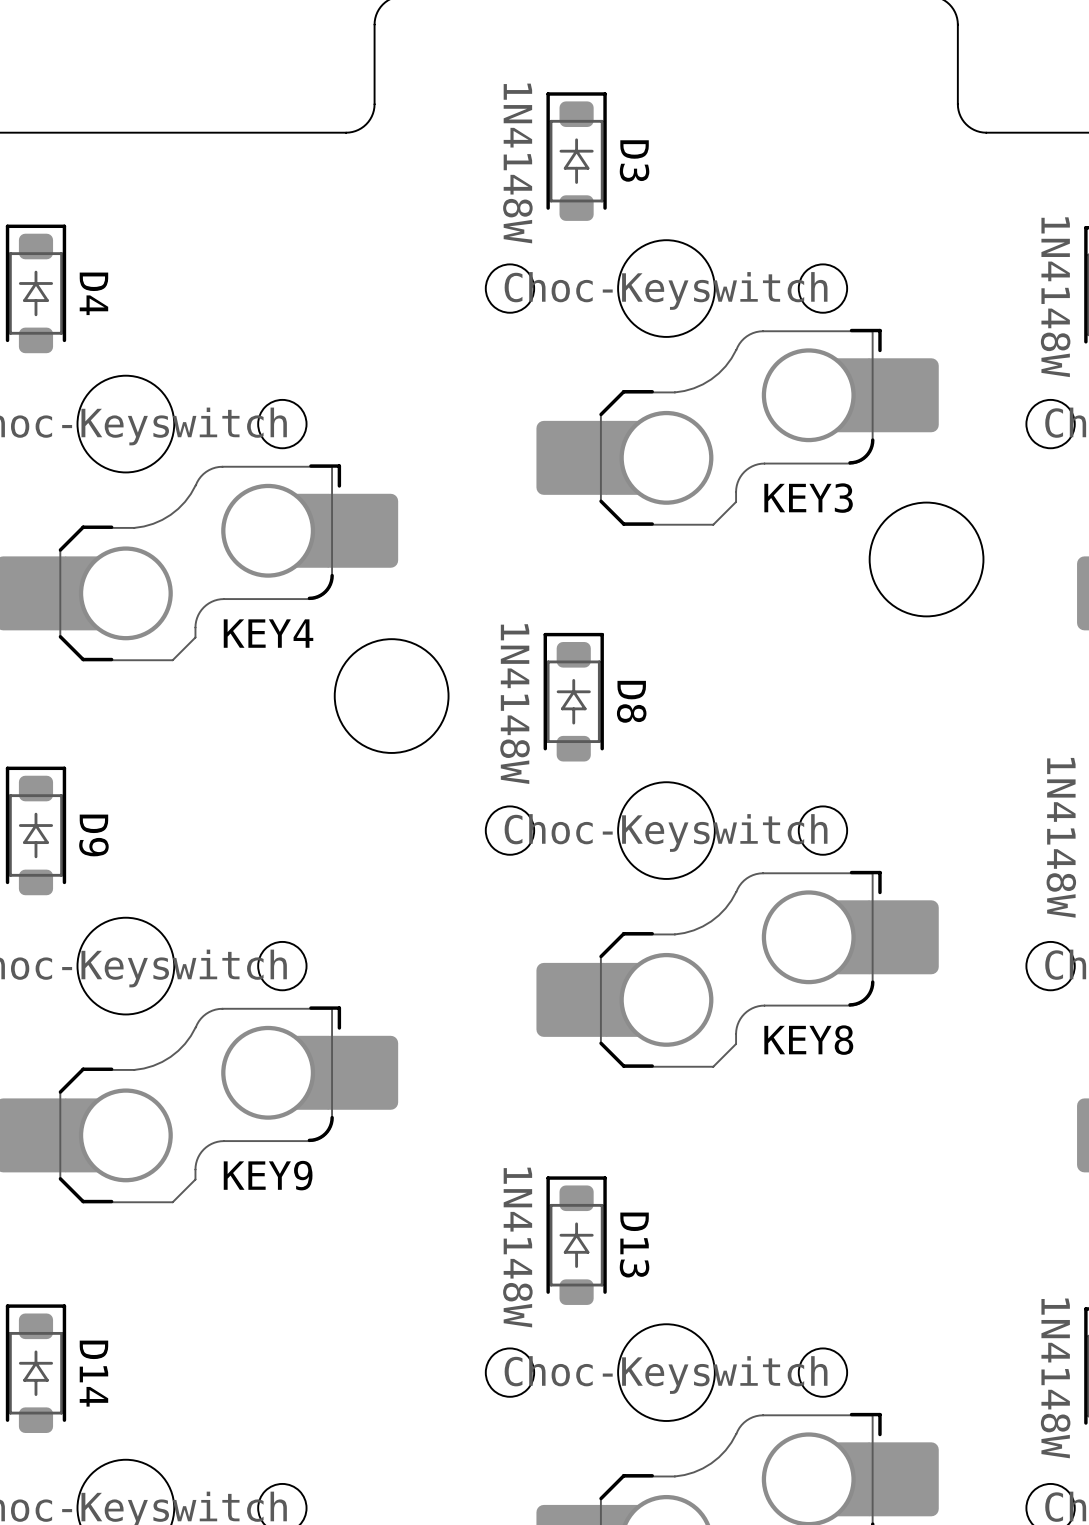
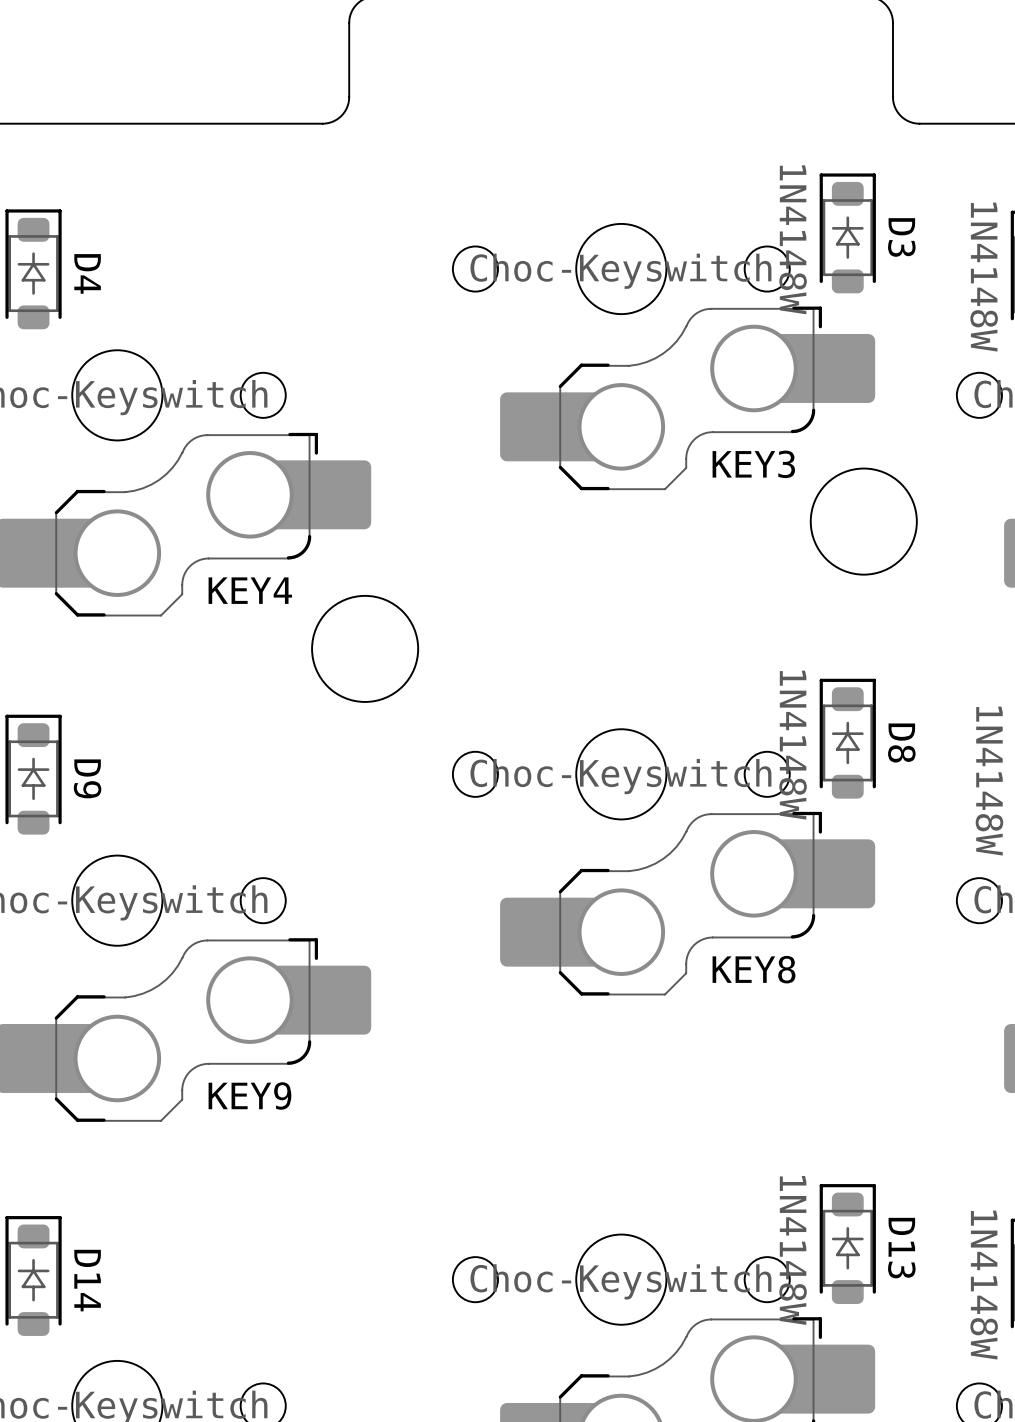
D3 position: (576, 156) -> (847, 233)
D8 position: (573, 697) -> (847, 738)
D13 position: (576, 1240) -> (847, 1244)

